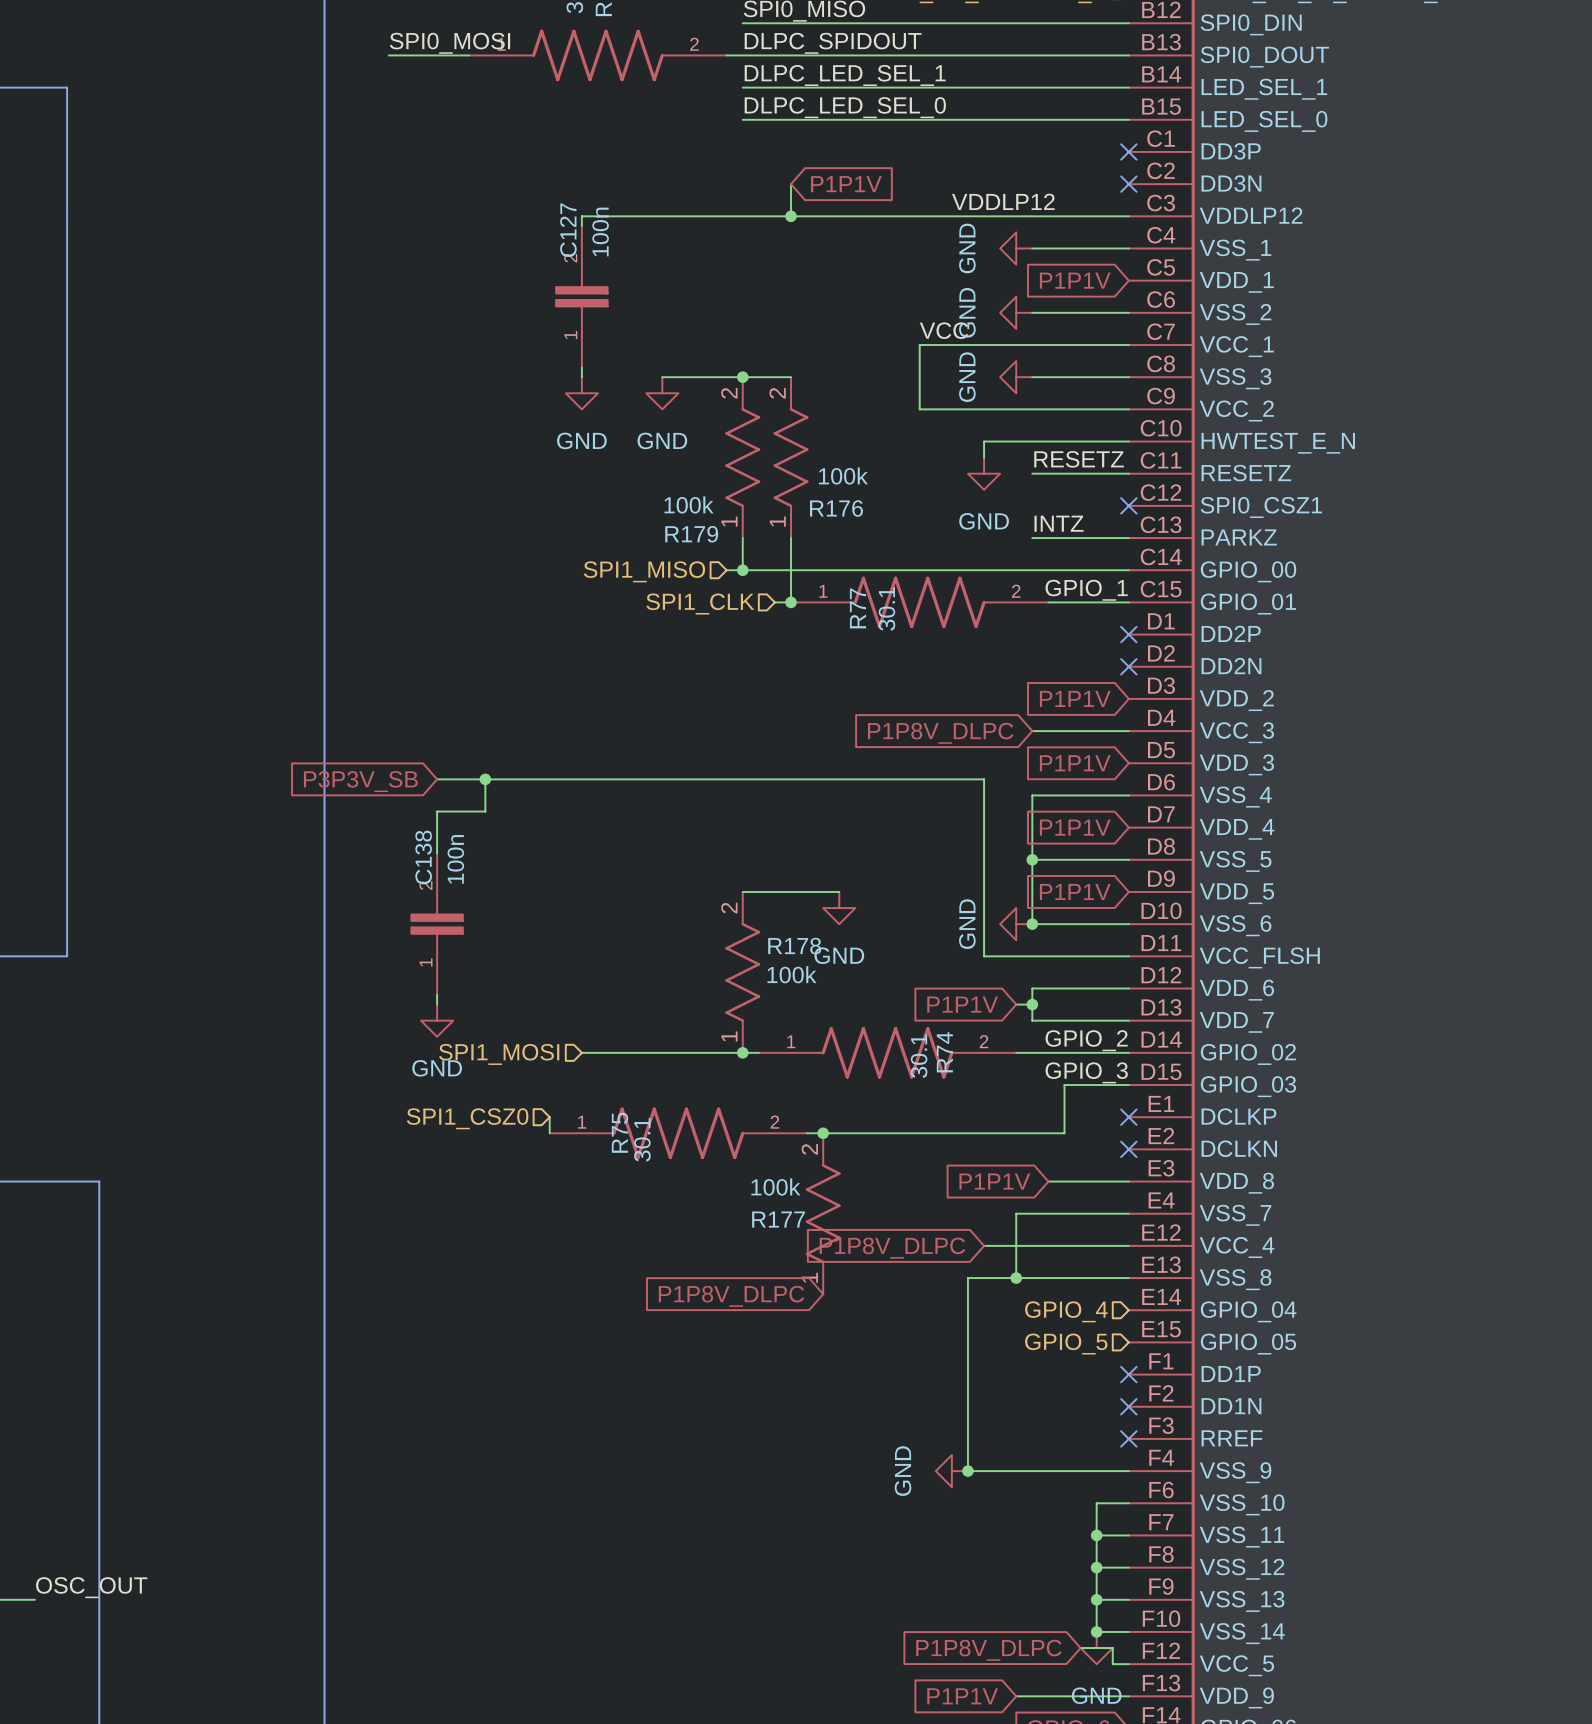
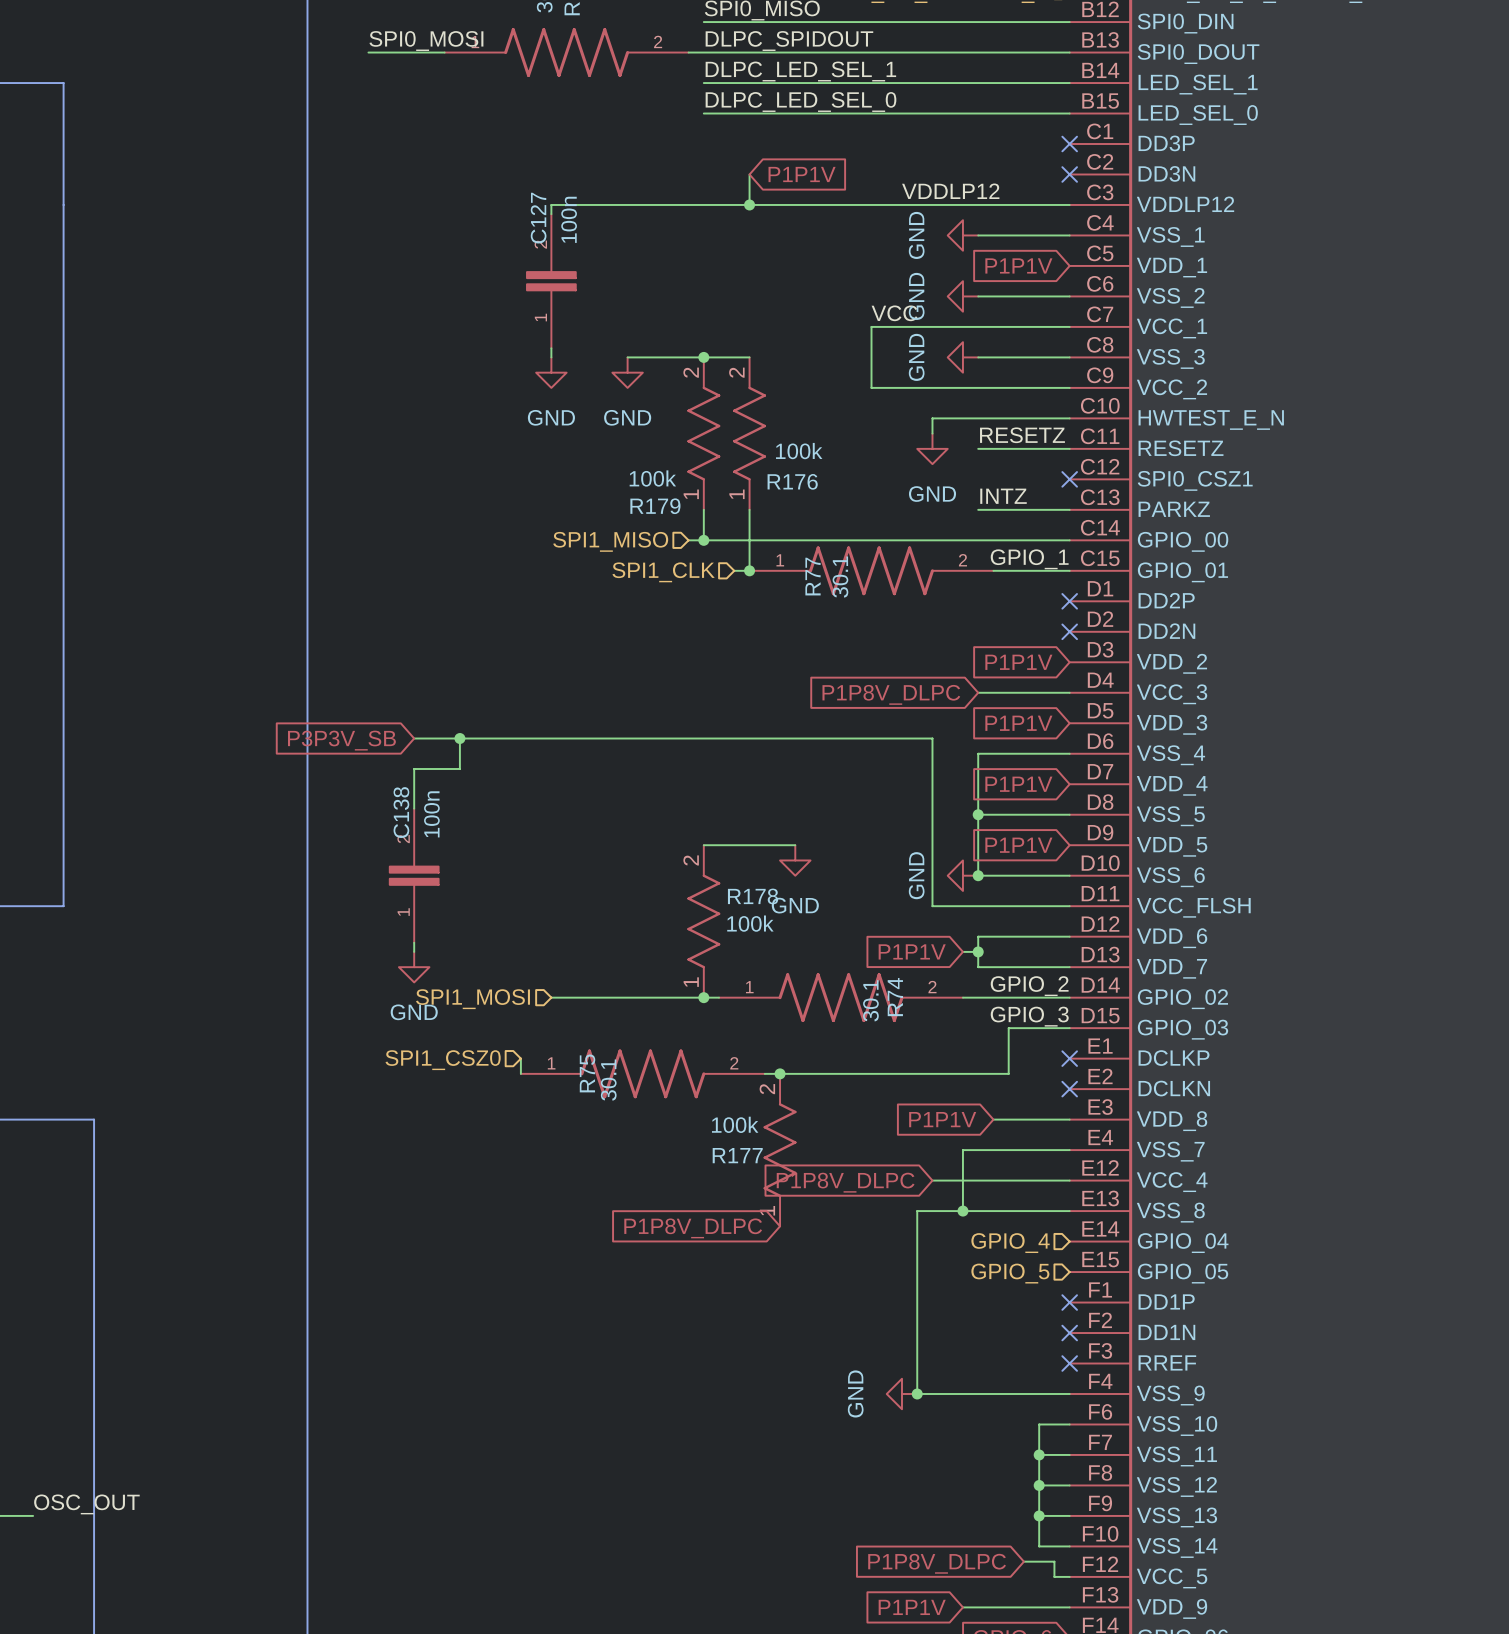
junction: (1096, 1631) -> none
power symbol: GND (1096, 1648) -> none

